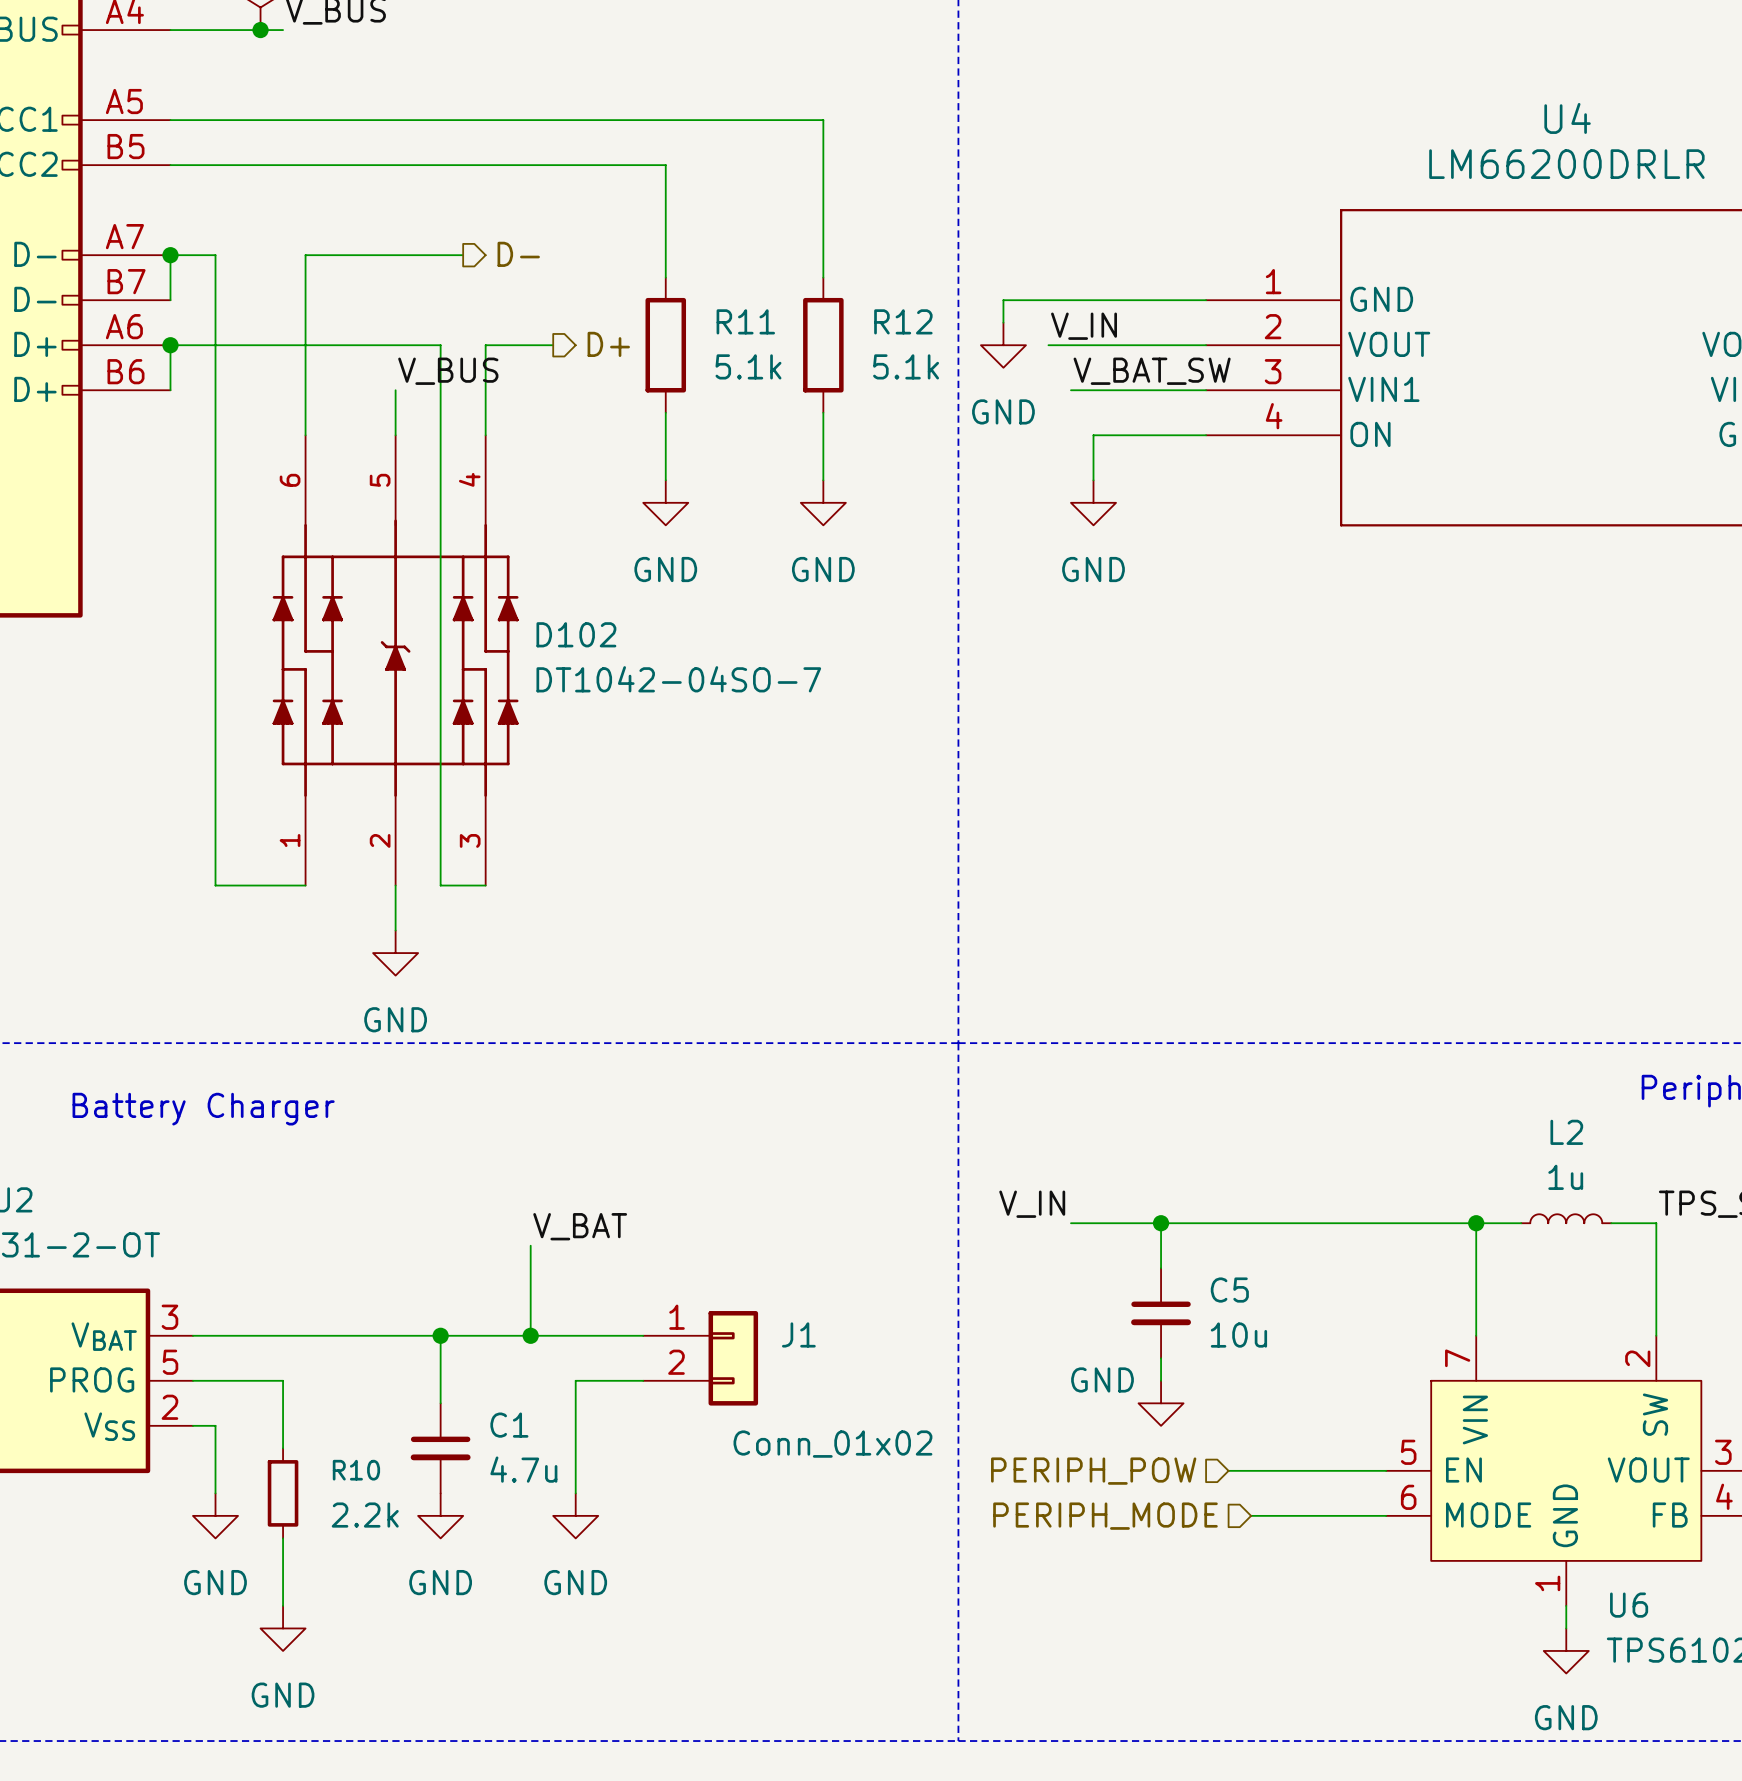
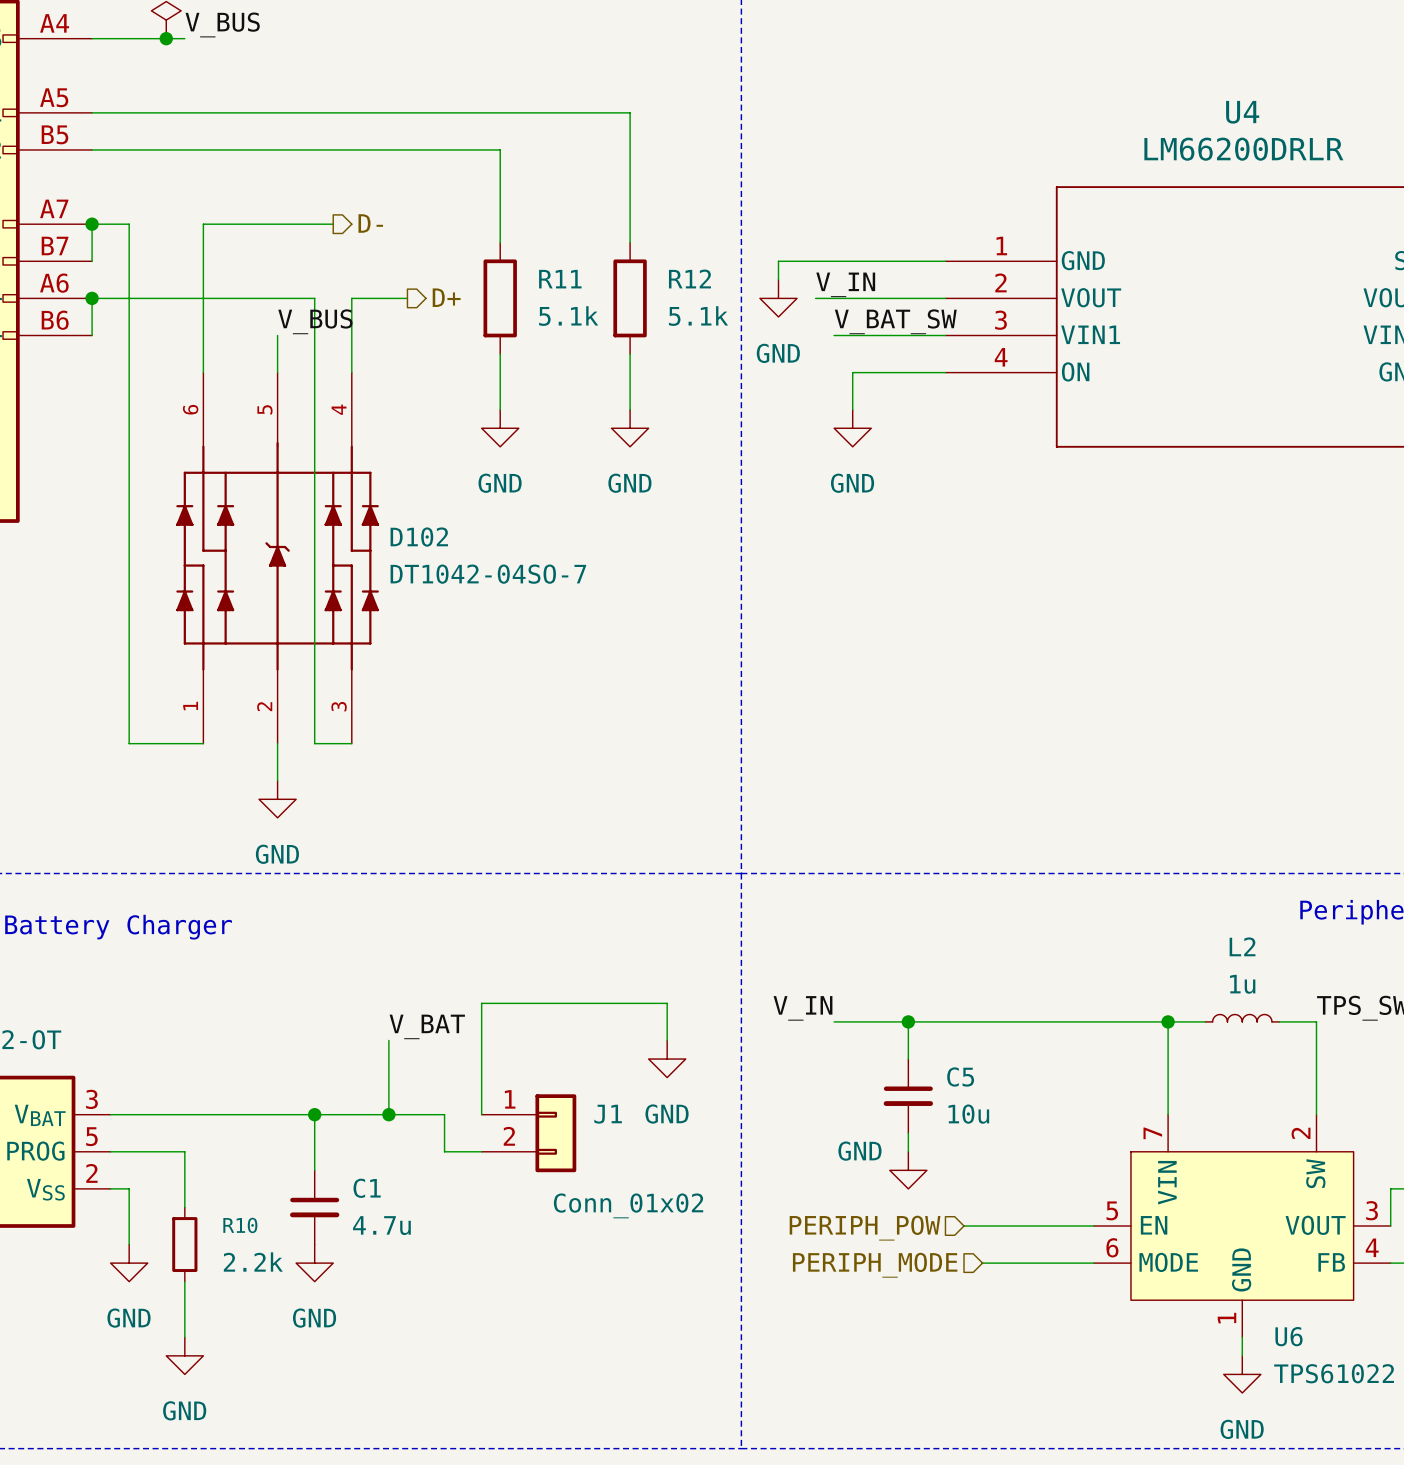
wire: none -> (667, 1040) (667, 1003) (481, 1003) (481, 1114)
wire: (598, 1335) (643, 1335) -> (444, 1114) (444, 1151)
wire: (598, 1380) (575, 1380) (575, 1493) -> none
power symbol position: GND (575, 1515) -> GND (667, 1059)

